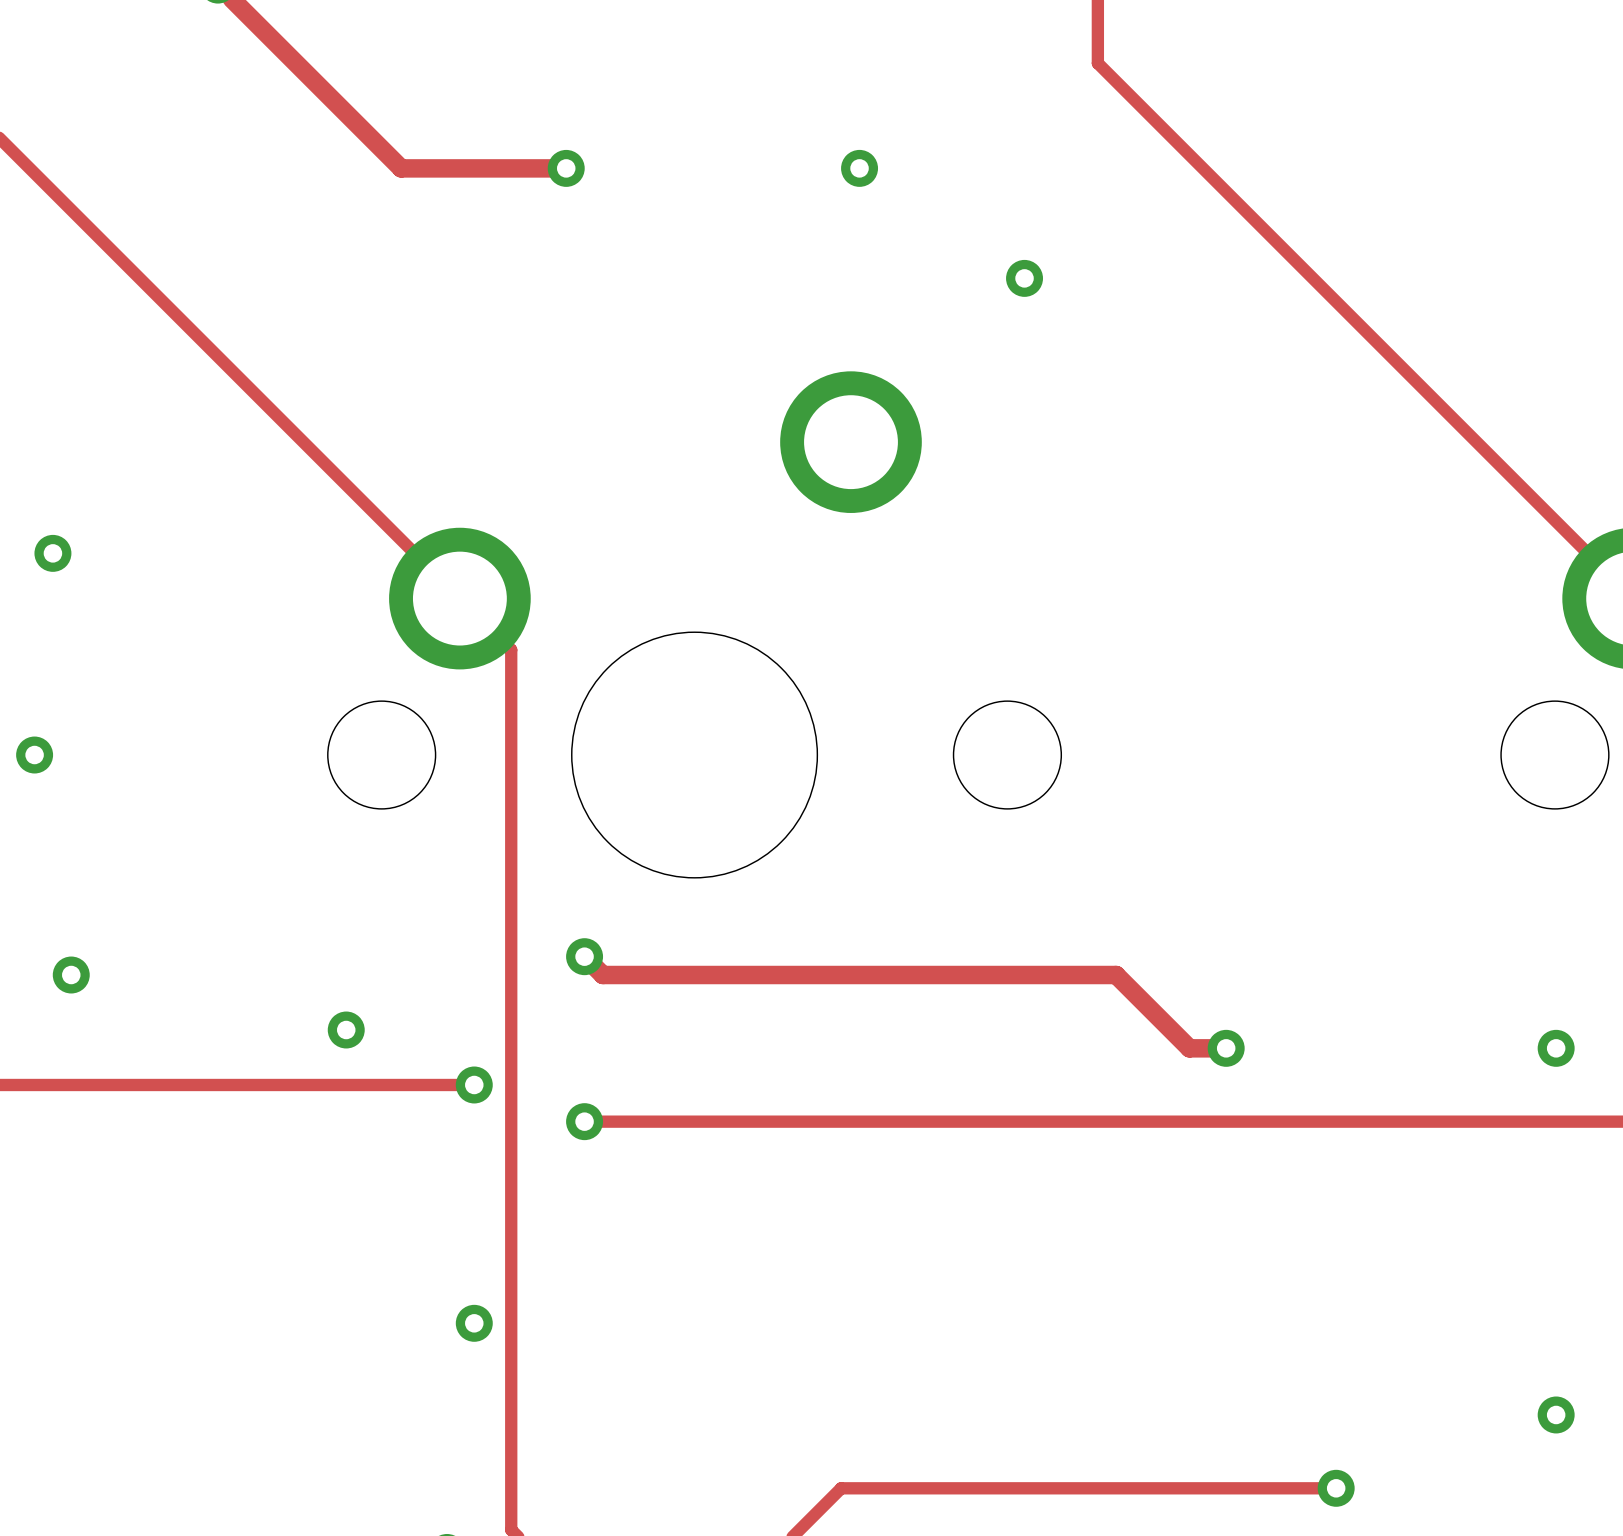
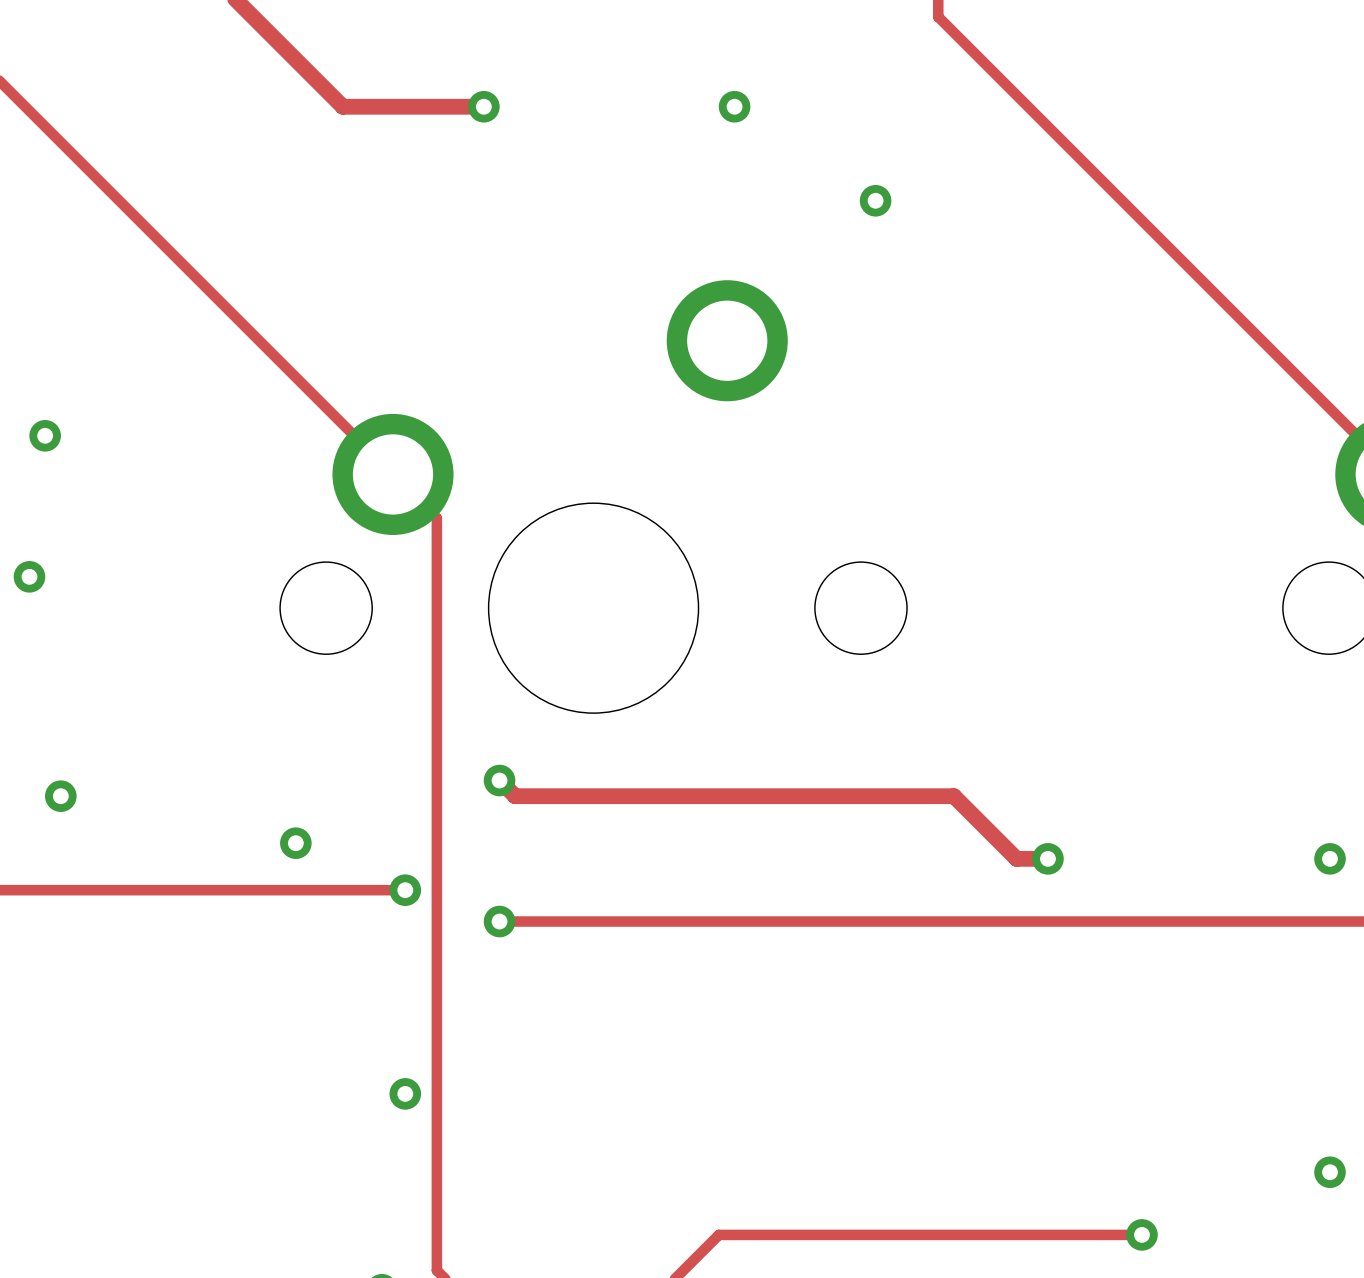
via position: (34, 755) -> (29, 576)

